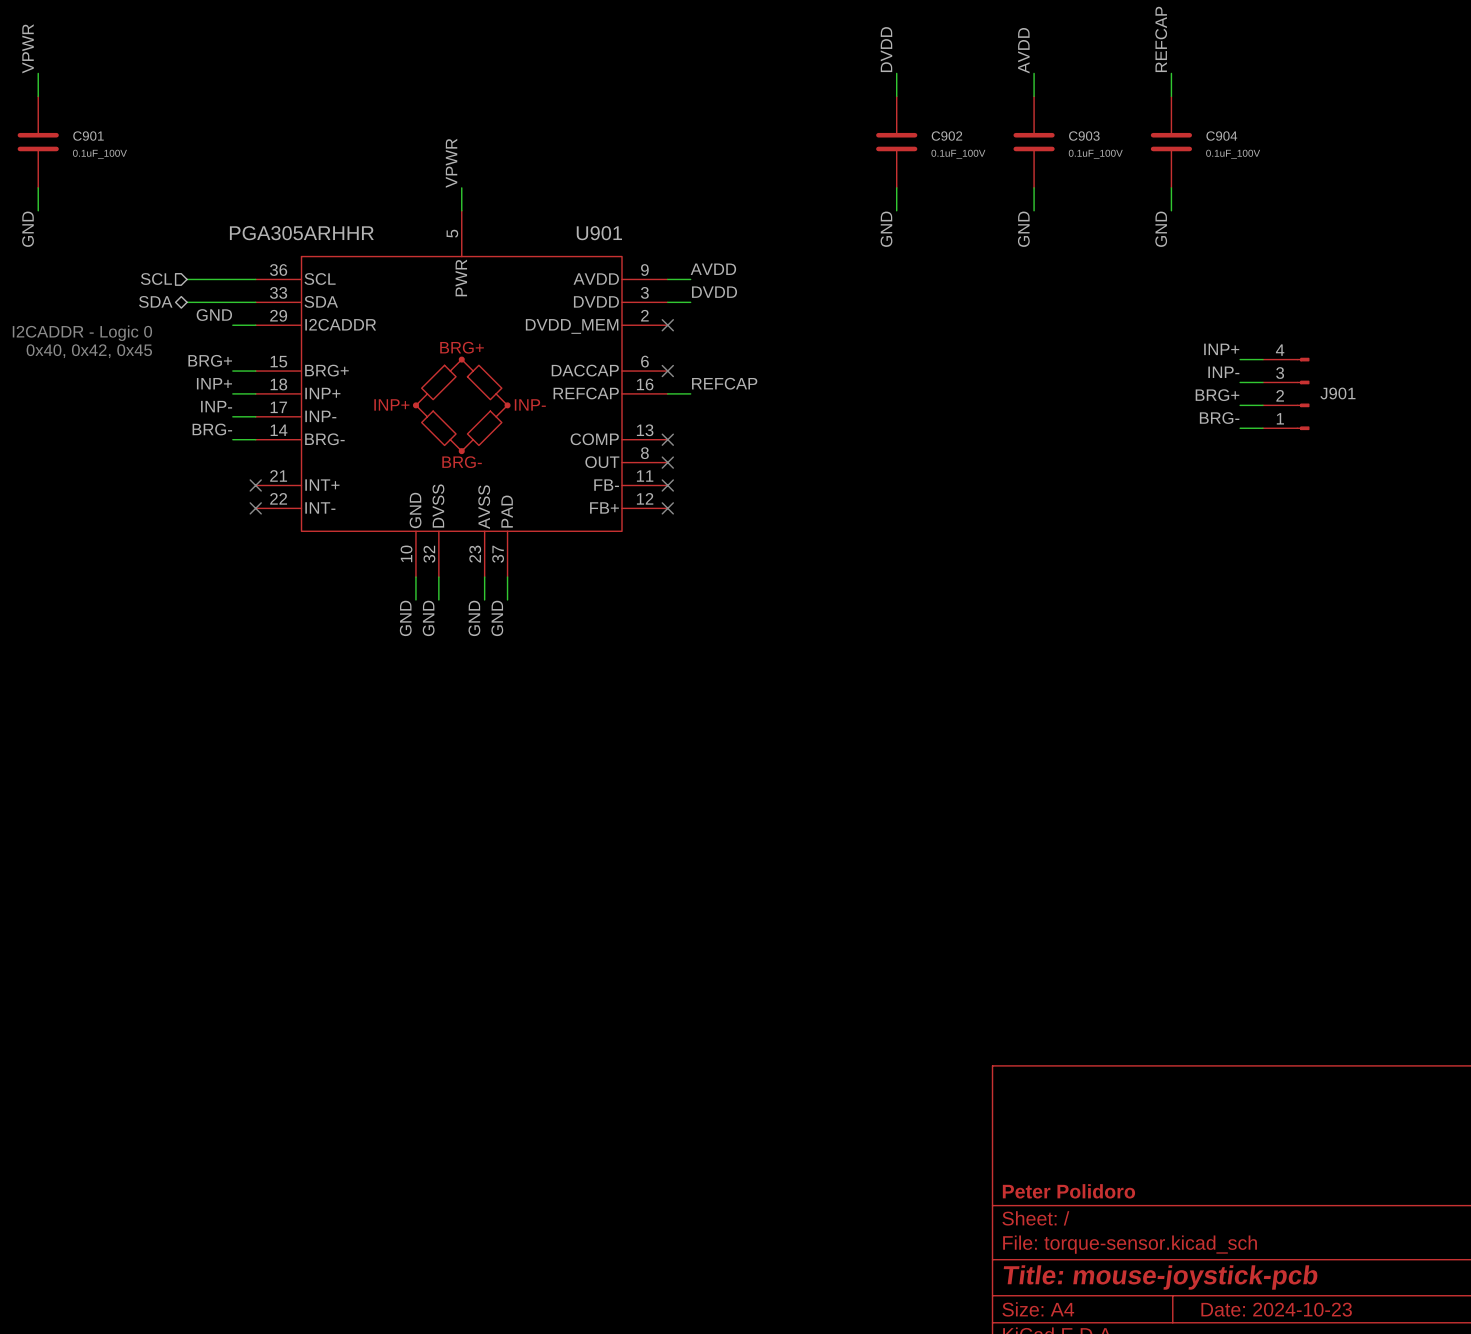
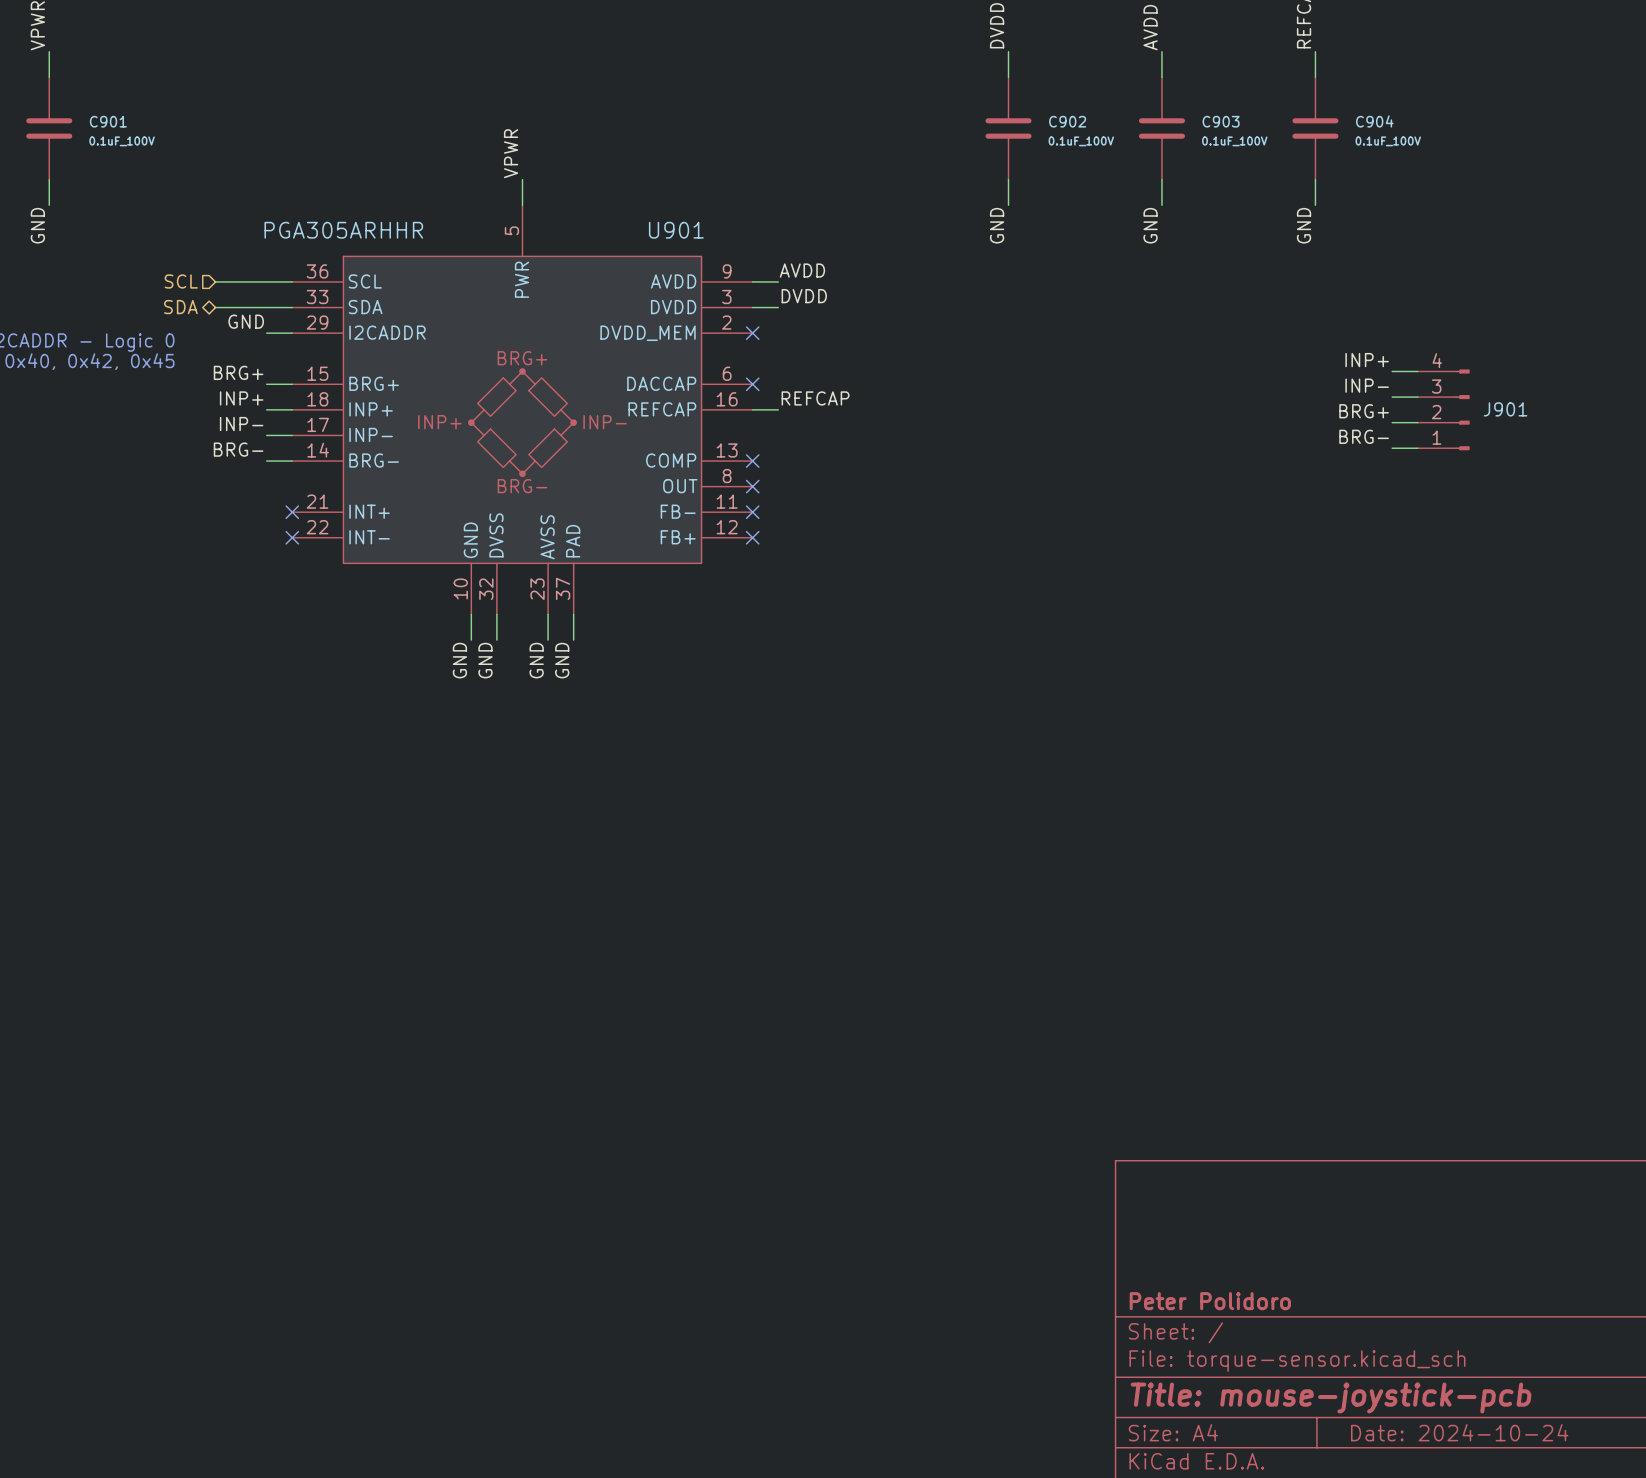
title block: Date: 2024-10-23 (1276, 1309) -> Date: 2024-10-24 (1459, 1432)

